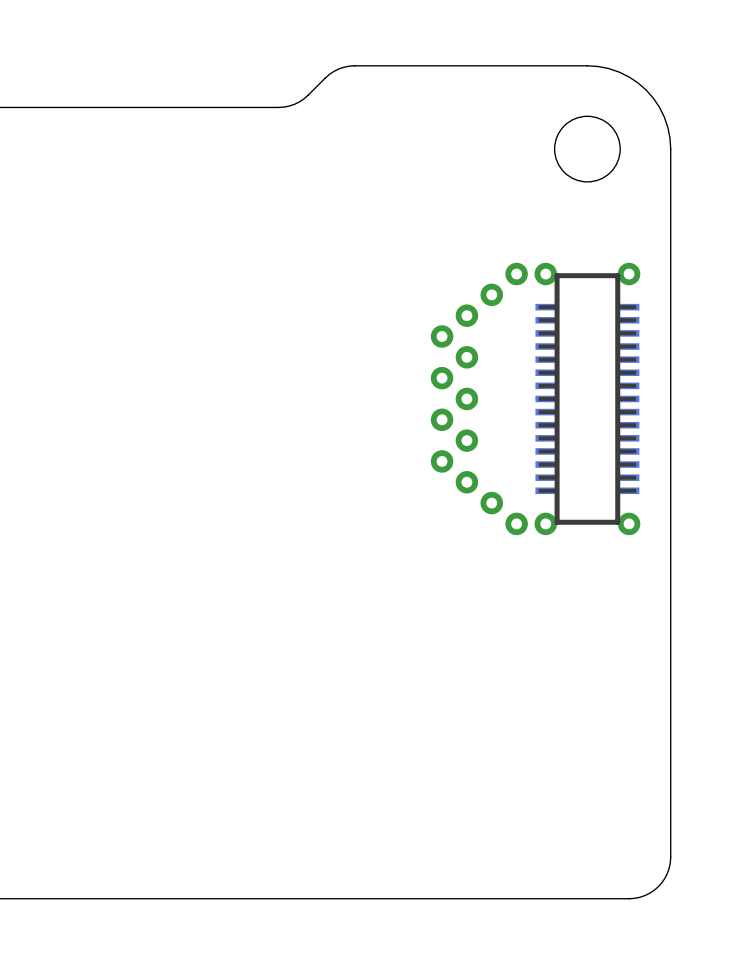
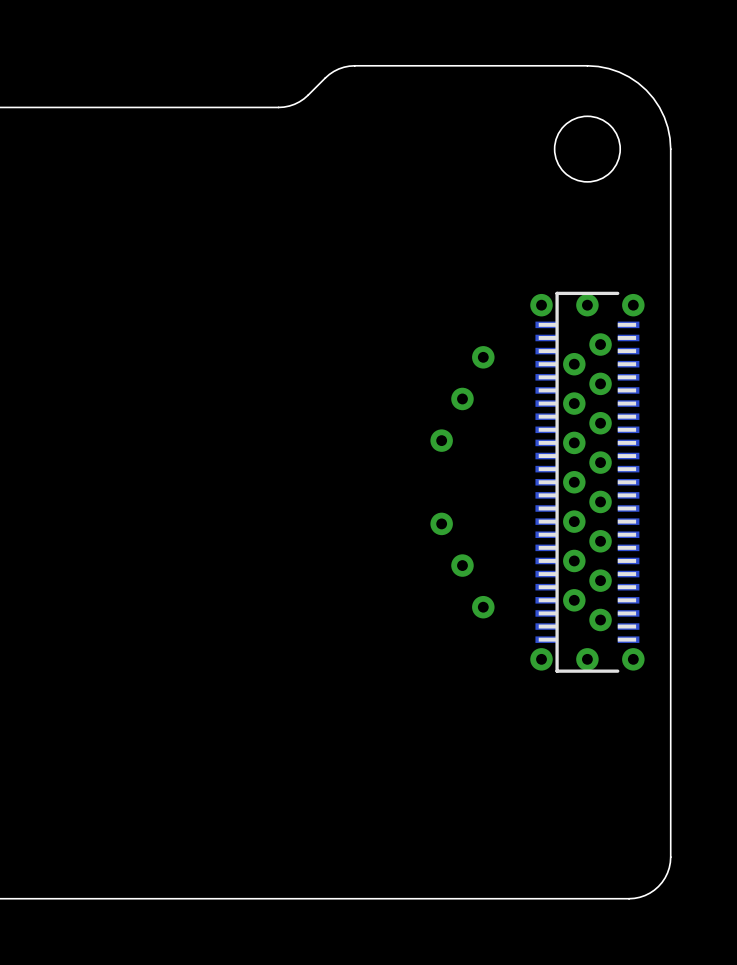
part: (535, 398) -> none
part: none -> (537, 482)

